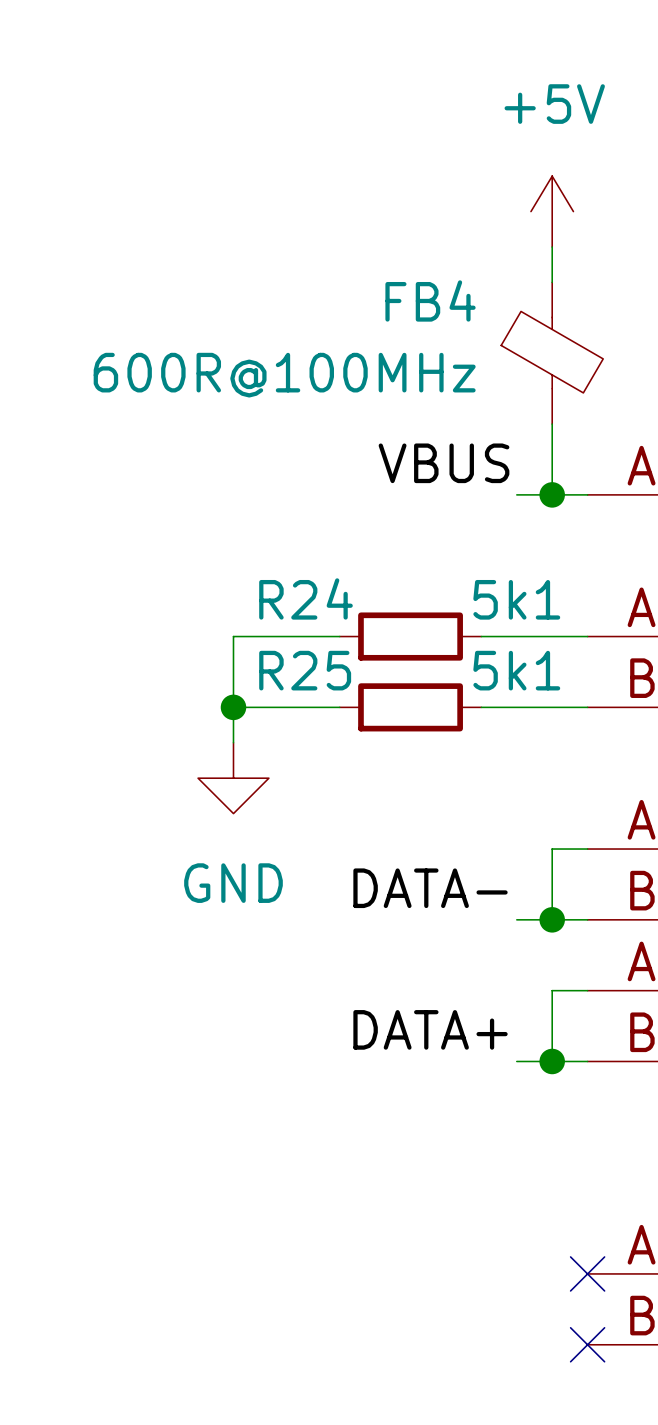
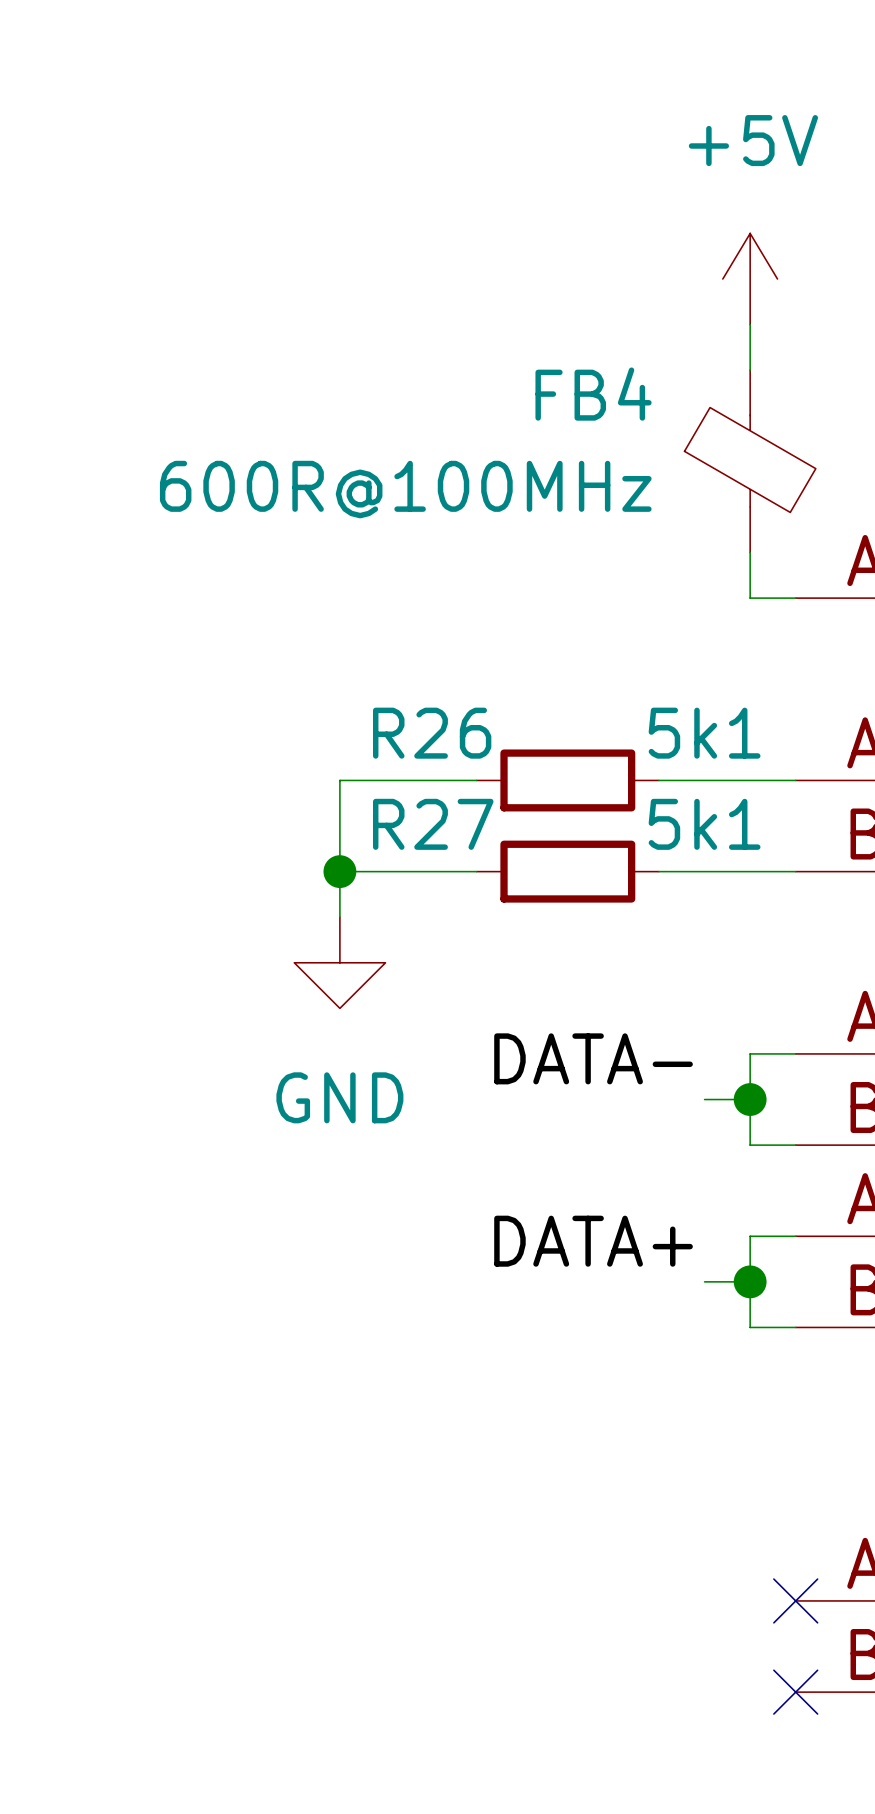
power symbol position: +5V (552, 211) -> +5V (750, 279)
FB4 position: (552, 353) -> (750, 461)
label: VBUS (444, 463) -> none
wire: (516, 494) (552, 494) -> none
junction: (552, 494) -> none
R24 name: R24 (306, 598) -> R26 (432, 733)
R25 name: R25 (305, 670) -> R27 (433, 824)
label position: DATA- (430, 888) -> DATA- (593, 1058)
wire: (516, 919) (552, 919) -> (704, 1099) (750, 1099)
junction position: (552, 919) -> (750, 1099)
label position: DATA+ (430, 1029) -> DATA+ (593, 1241)
wire: (516, 1061) (552, 1061) -> (704, 1281) (750, 1281)
junction position: (552, 1061) -> (750, 1281)

